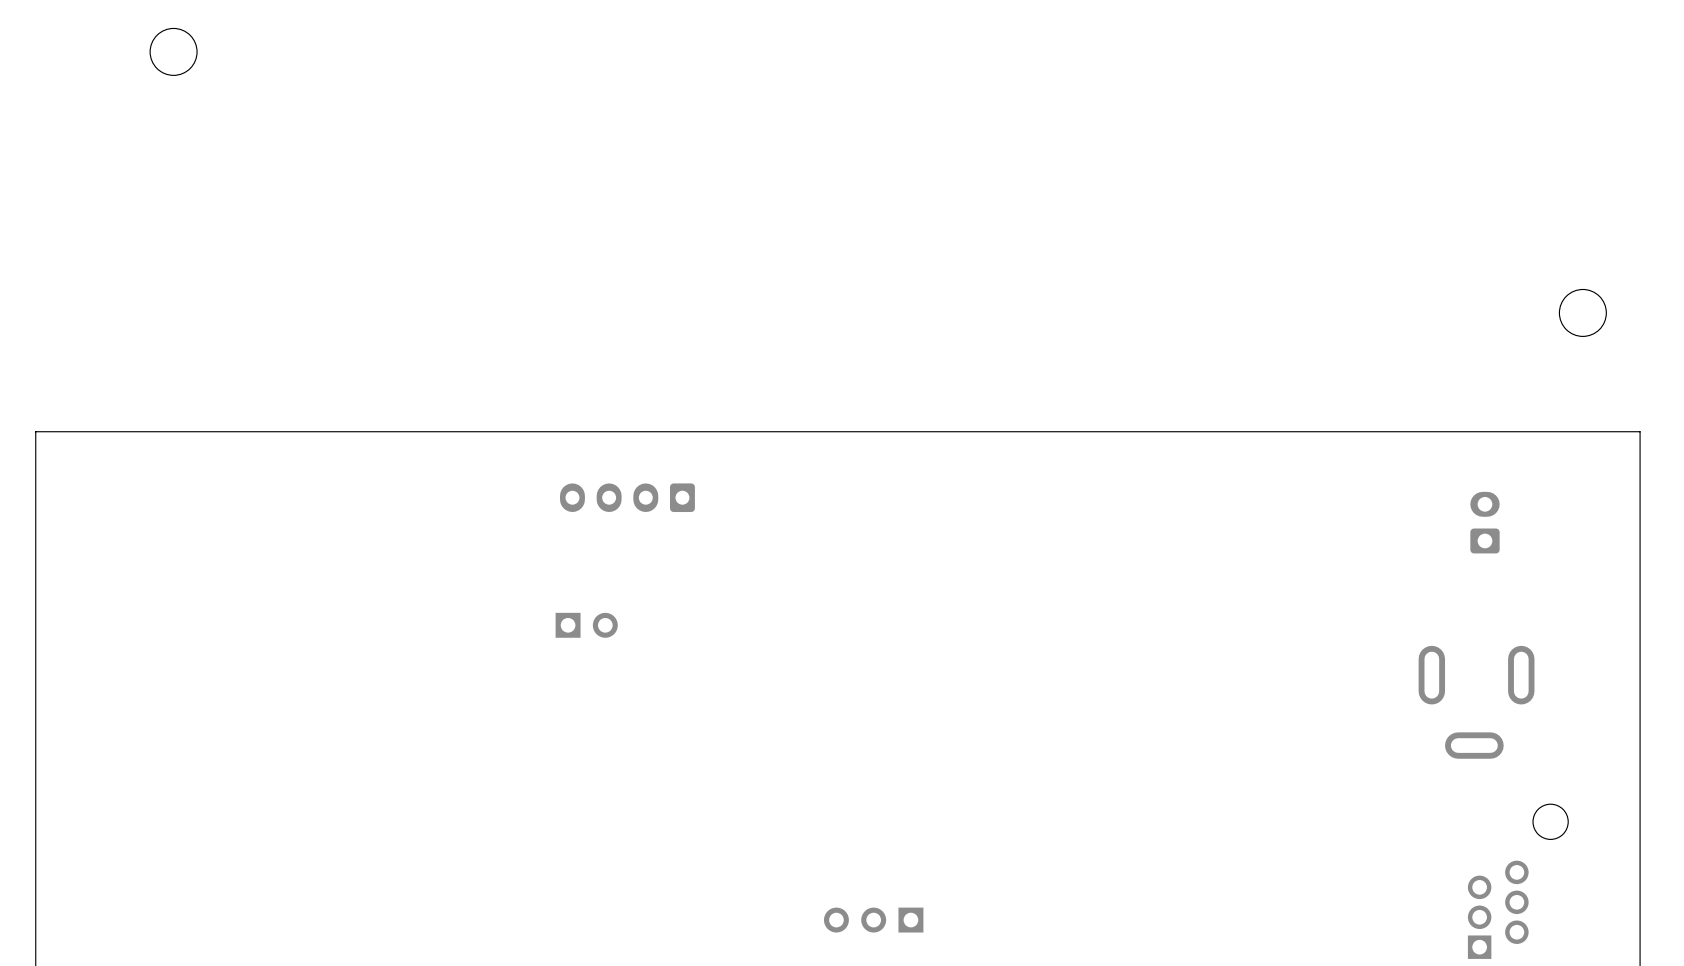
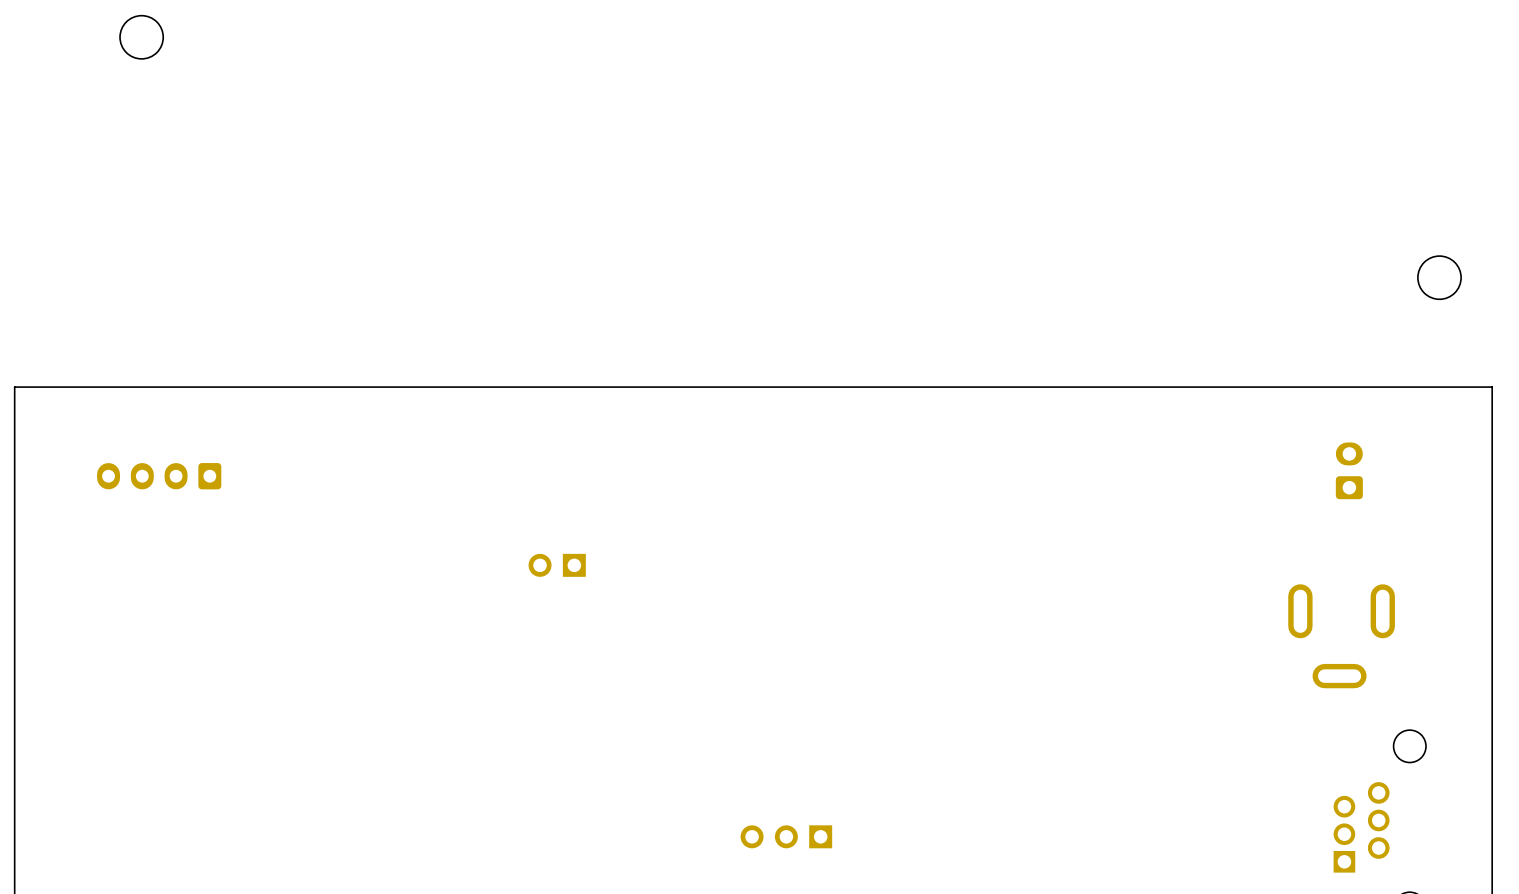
part: (627, 497) -> none
part: none -> (159, 476)
part rotation: 0° (586, 625) -> 180° (557, 565)
part position: (586, 625) -> (557, 565)

